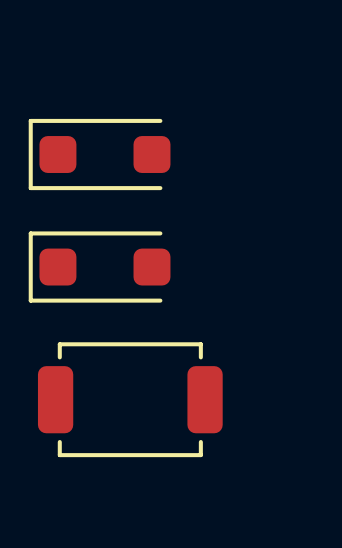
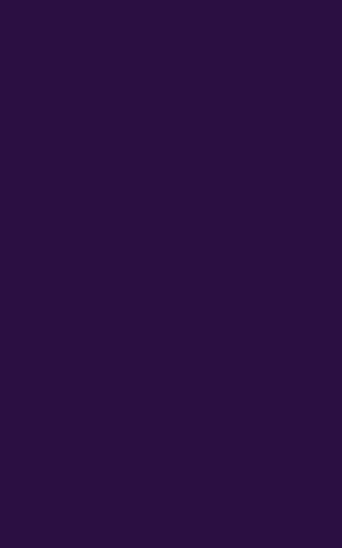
part: (99, 154) -> none
part: (99, 267) -> none
part: (130, 399) -> none

